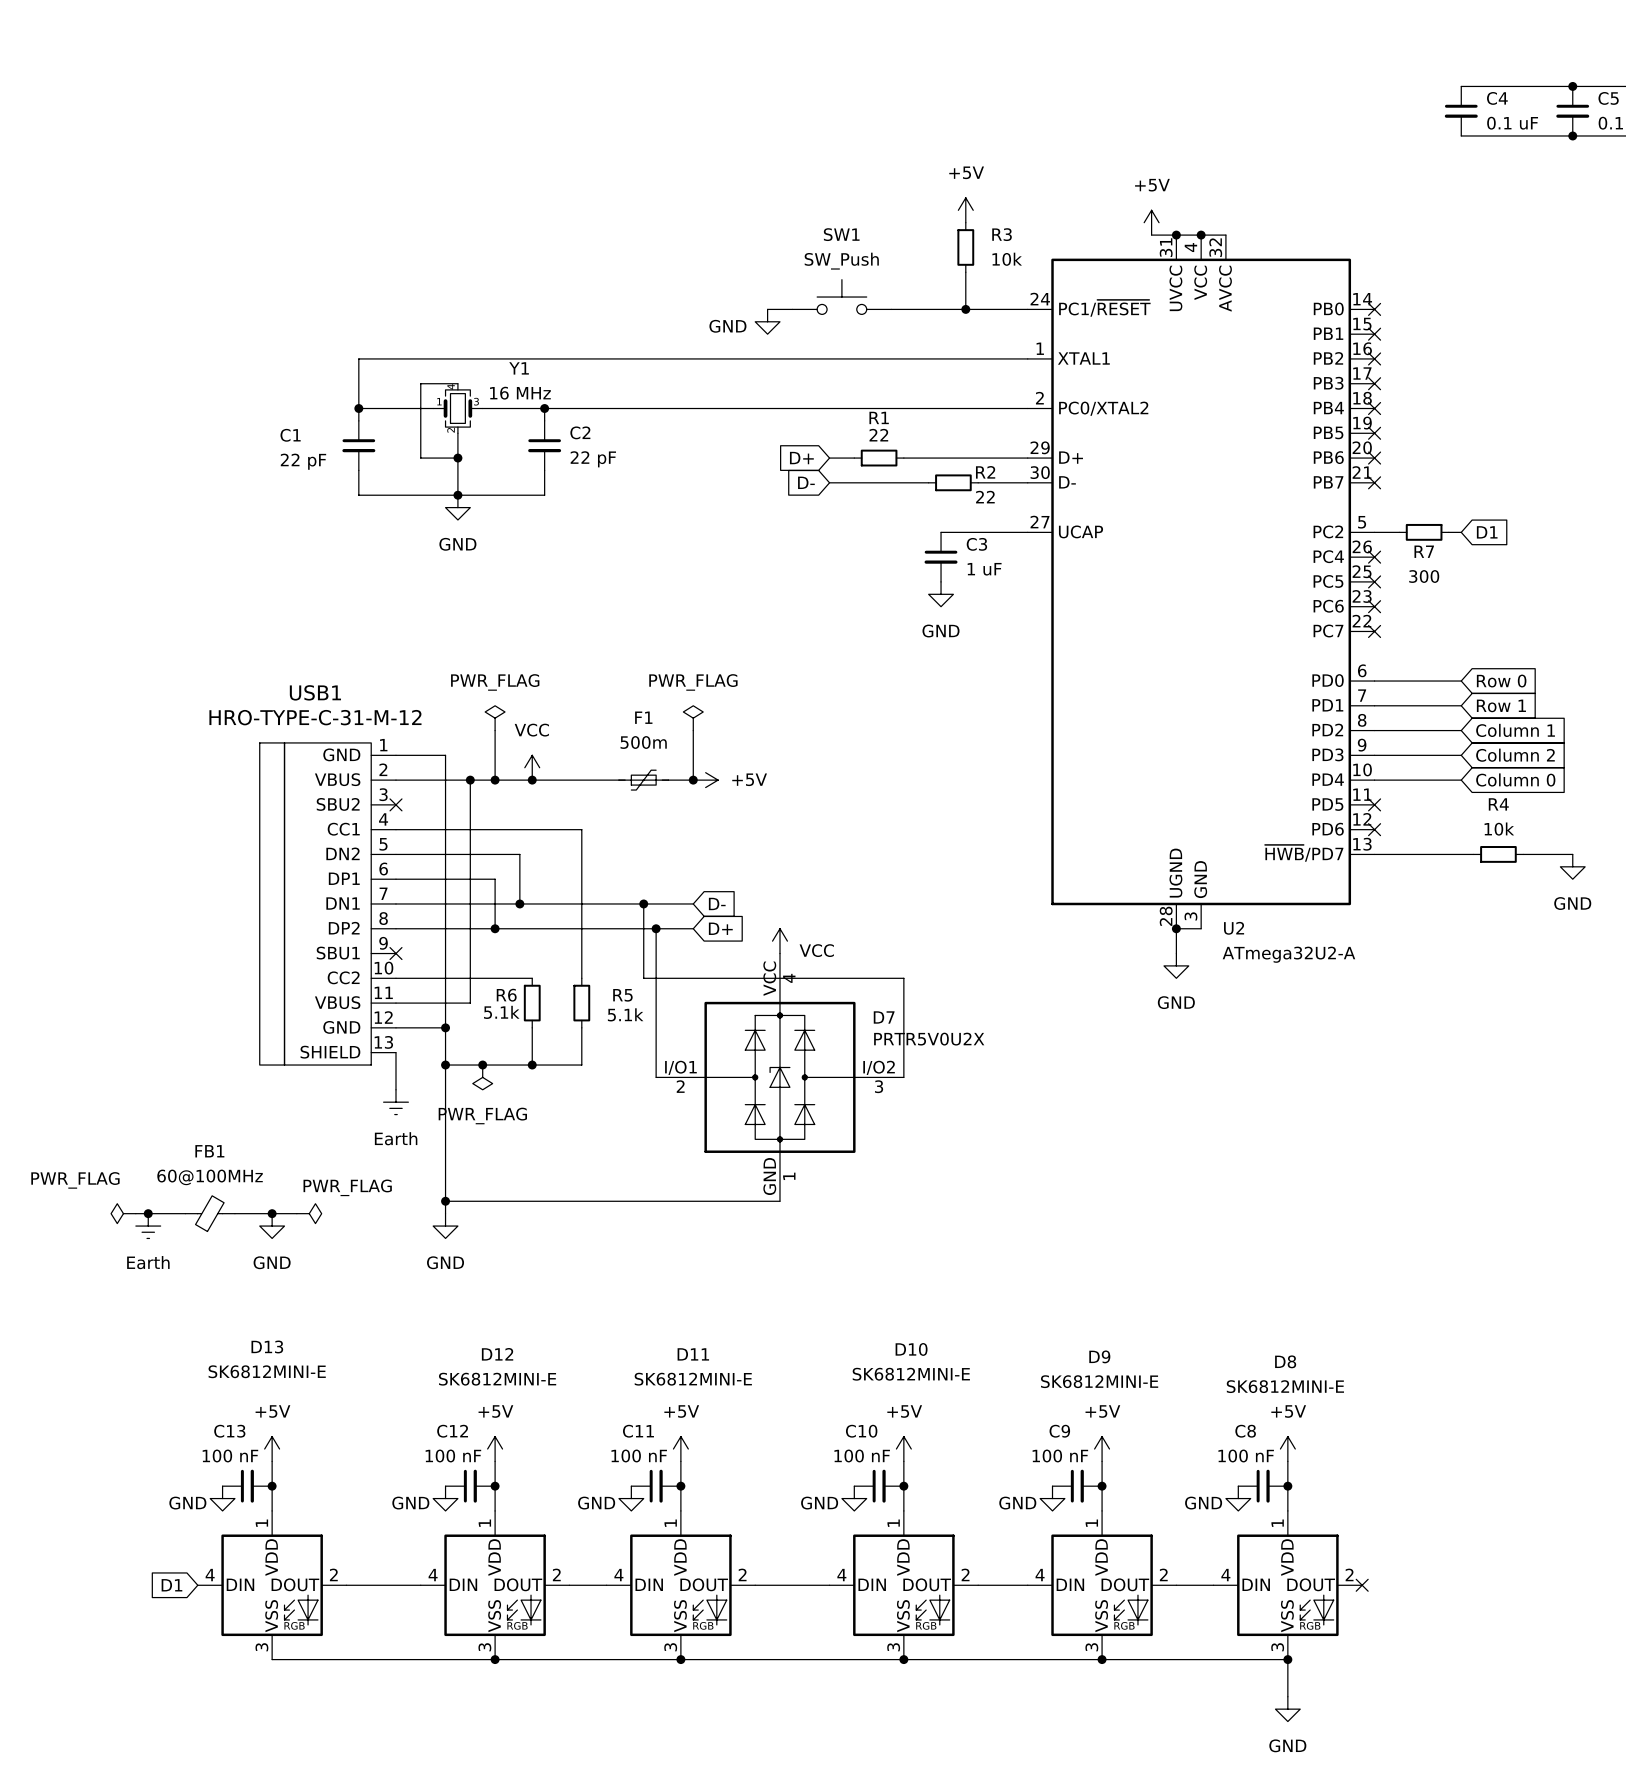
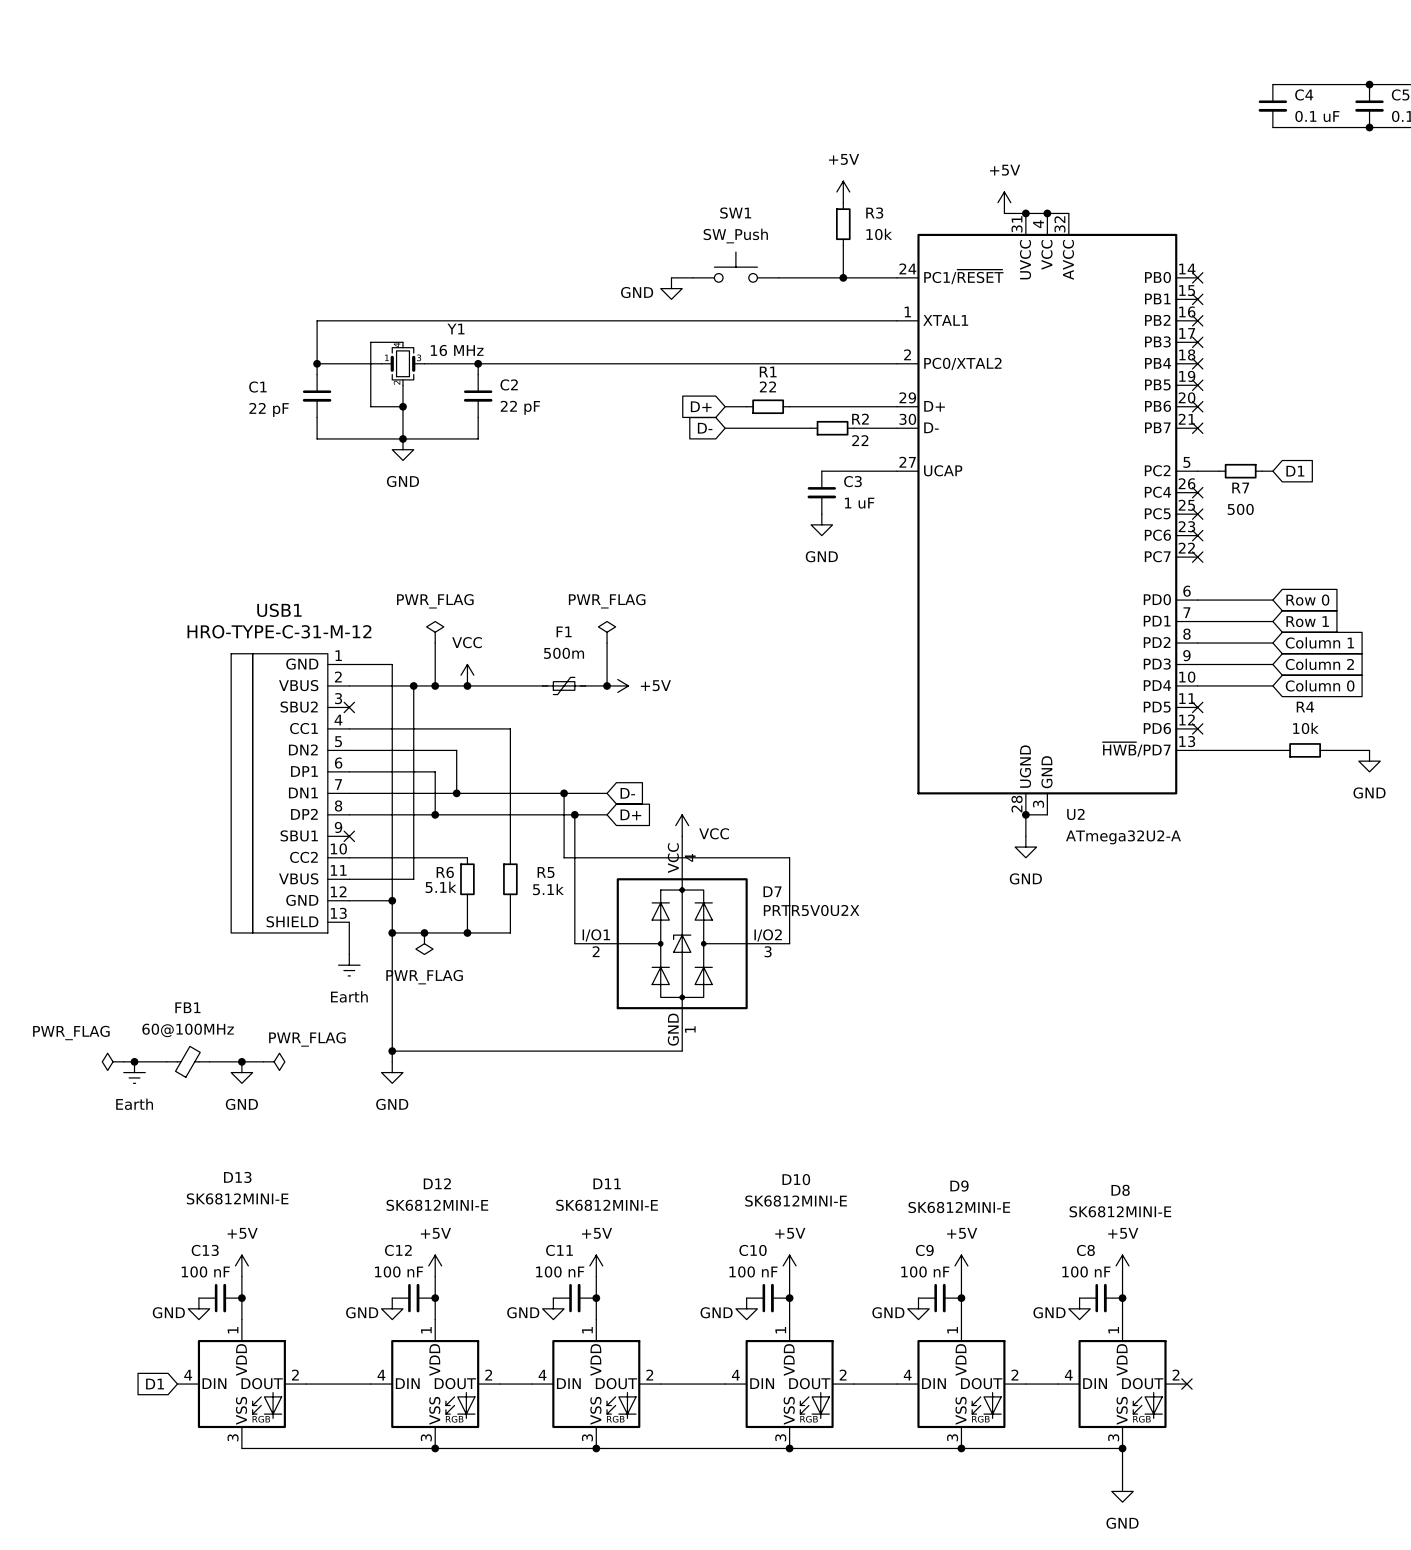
R7 value: 300 (1424, 576) -> 500 (1240, 509)

